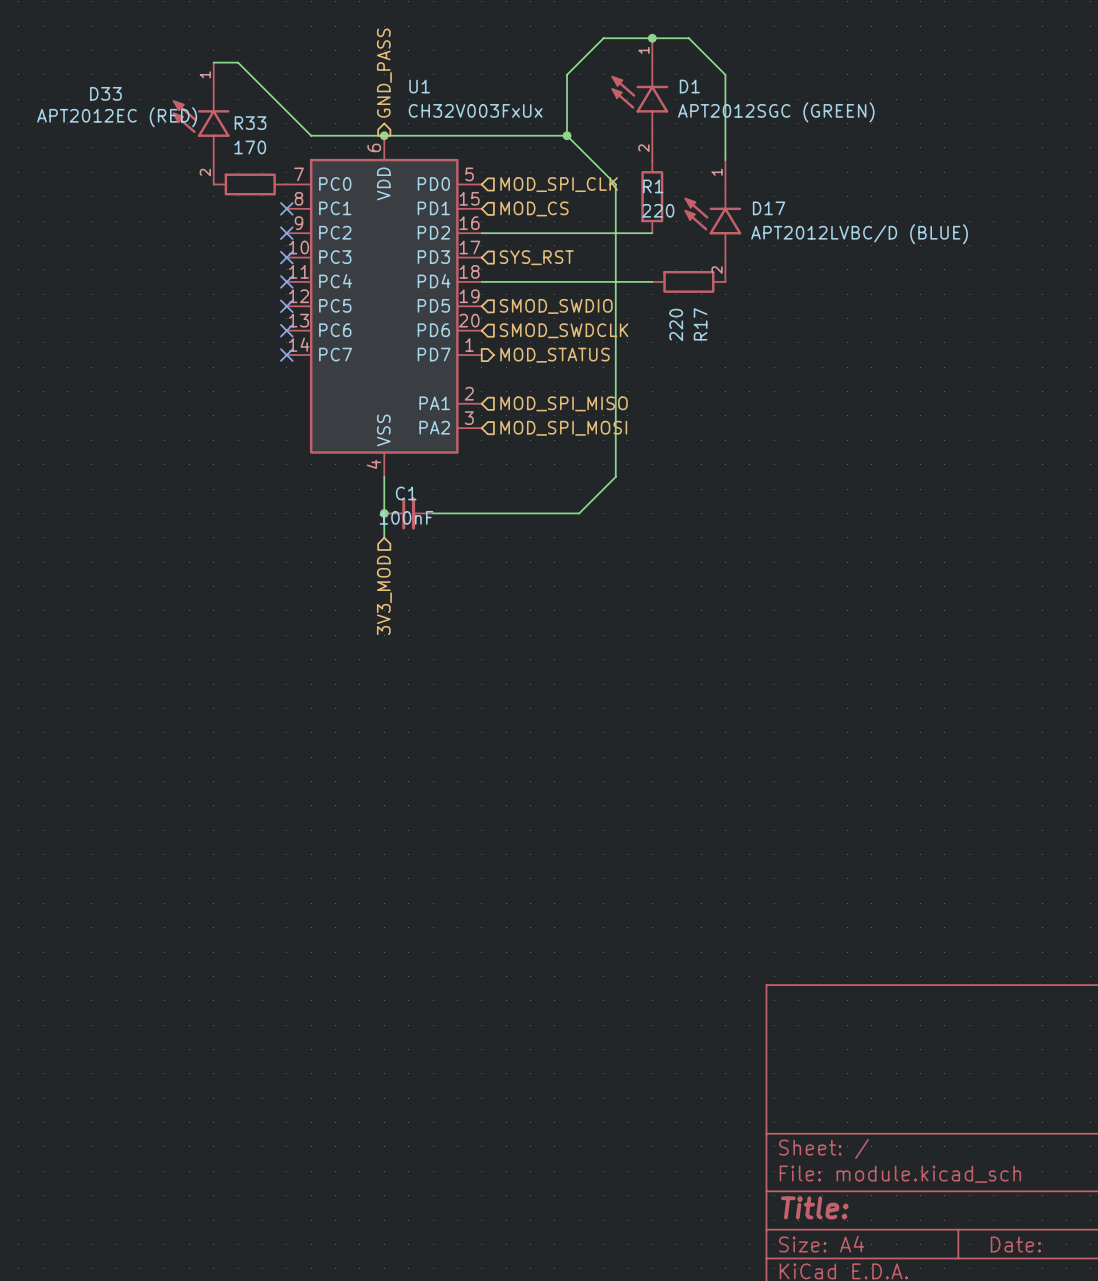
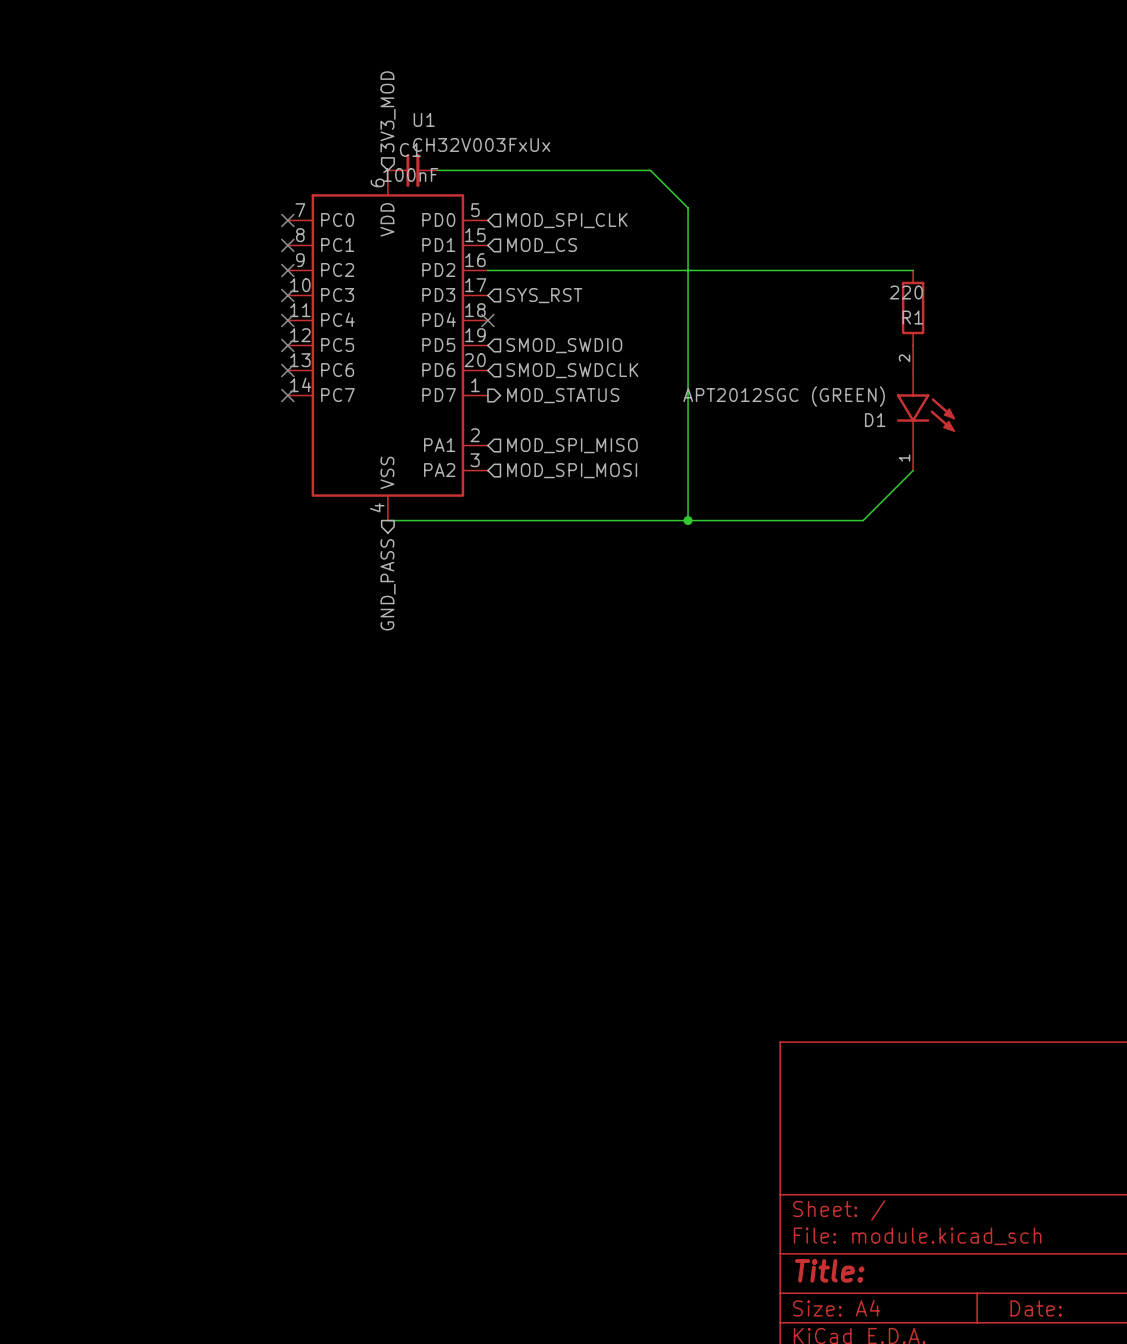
junction: (652, 38) -> none
wire: (213, 62) (238, 62) (311, 135) (433, 135) -> none
hierarchical label shape: output (384, 73) -> input (388, 111)
hierarchical label: GND_PASS (384, 73) -> 3V3_MOD (388, 111)
D1 rotation: 0° (639, 99) -> 180° (926, 408)
D1 position: (639, 99) -> (926, 408)
D33: APT2012EC (RED) (201, 123) -> none
junction: (384, 135) -> none
wire: none -> (575, 170) (650, 170) (688, 207) (688, 520)
junction: (567, 135) -> none
wire: (725, 160) (725, 74) (688, 38) (603, 38) (567, 74) (567, 135) (615, 184) (615, 476) (579, 513) (433, 513) -> none
R33: 170 (250, 184) -> none
no-connect mark: none -> (287, 220)
R1 name position: R1 (653, 186) -> R1 (912, 317)
R1 position: (652, 196) -> (913, 307)
R1 value position: 220 (658, 210) -> 220 (906, 292)
D17: APT2012LVBC/D (BLUE) (712, 221) -> none
wire: none -> (663, 270) (913, 270)
wire: (481, 281) (652, 281) -> none
no-connect mark: none -> (487, 320)
R17: 220 (688, 281) -> none
wire: (384, 476) (384, 537) -> (387, 520) (863, 520) (913, 470)
junction: none -> (688, 520)
junction: (384, 513) -> none
C1 position: (408, 513) -> (412, 170)
hierarchical label: none -> GND_PASS (388, 584)
hierarchical label: 3V3_MOD (384, 595) -> none

